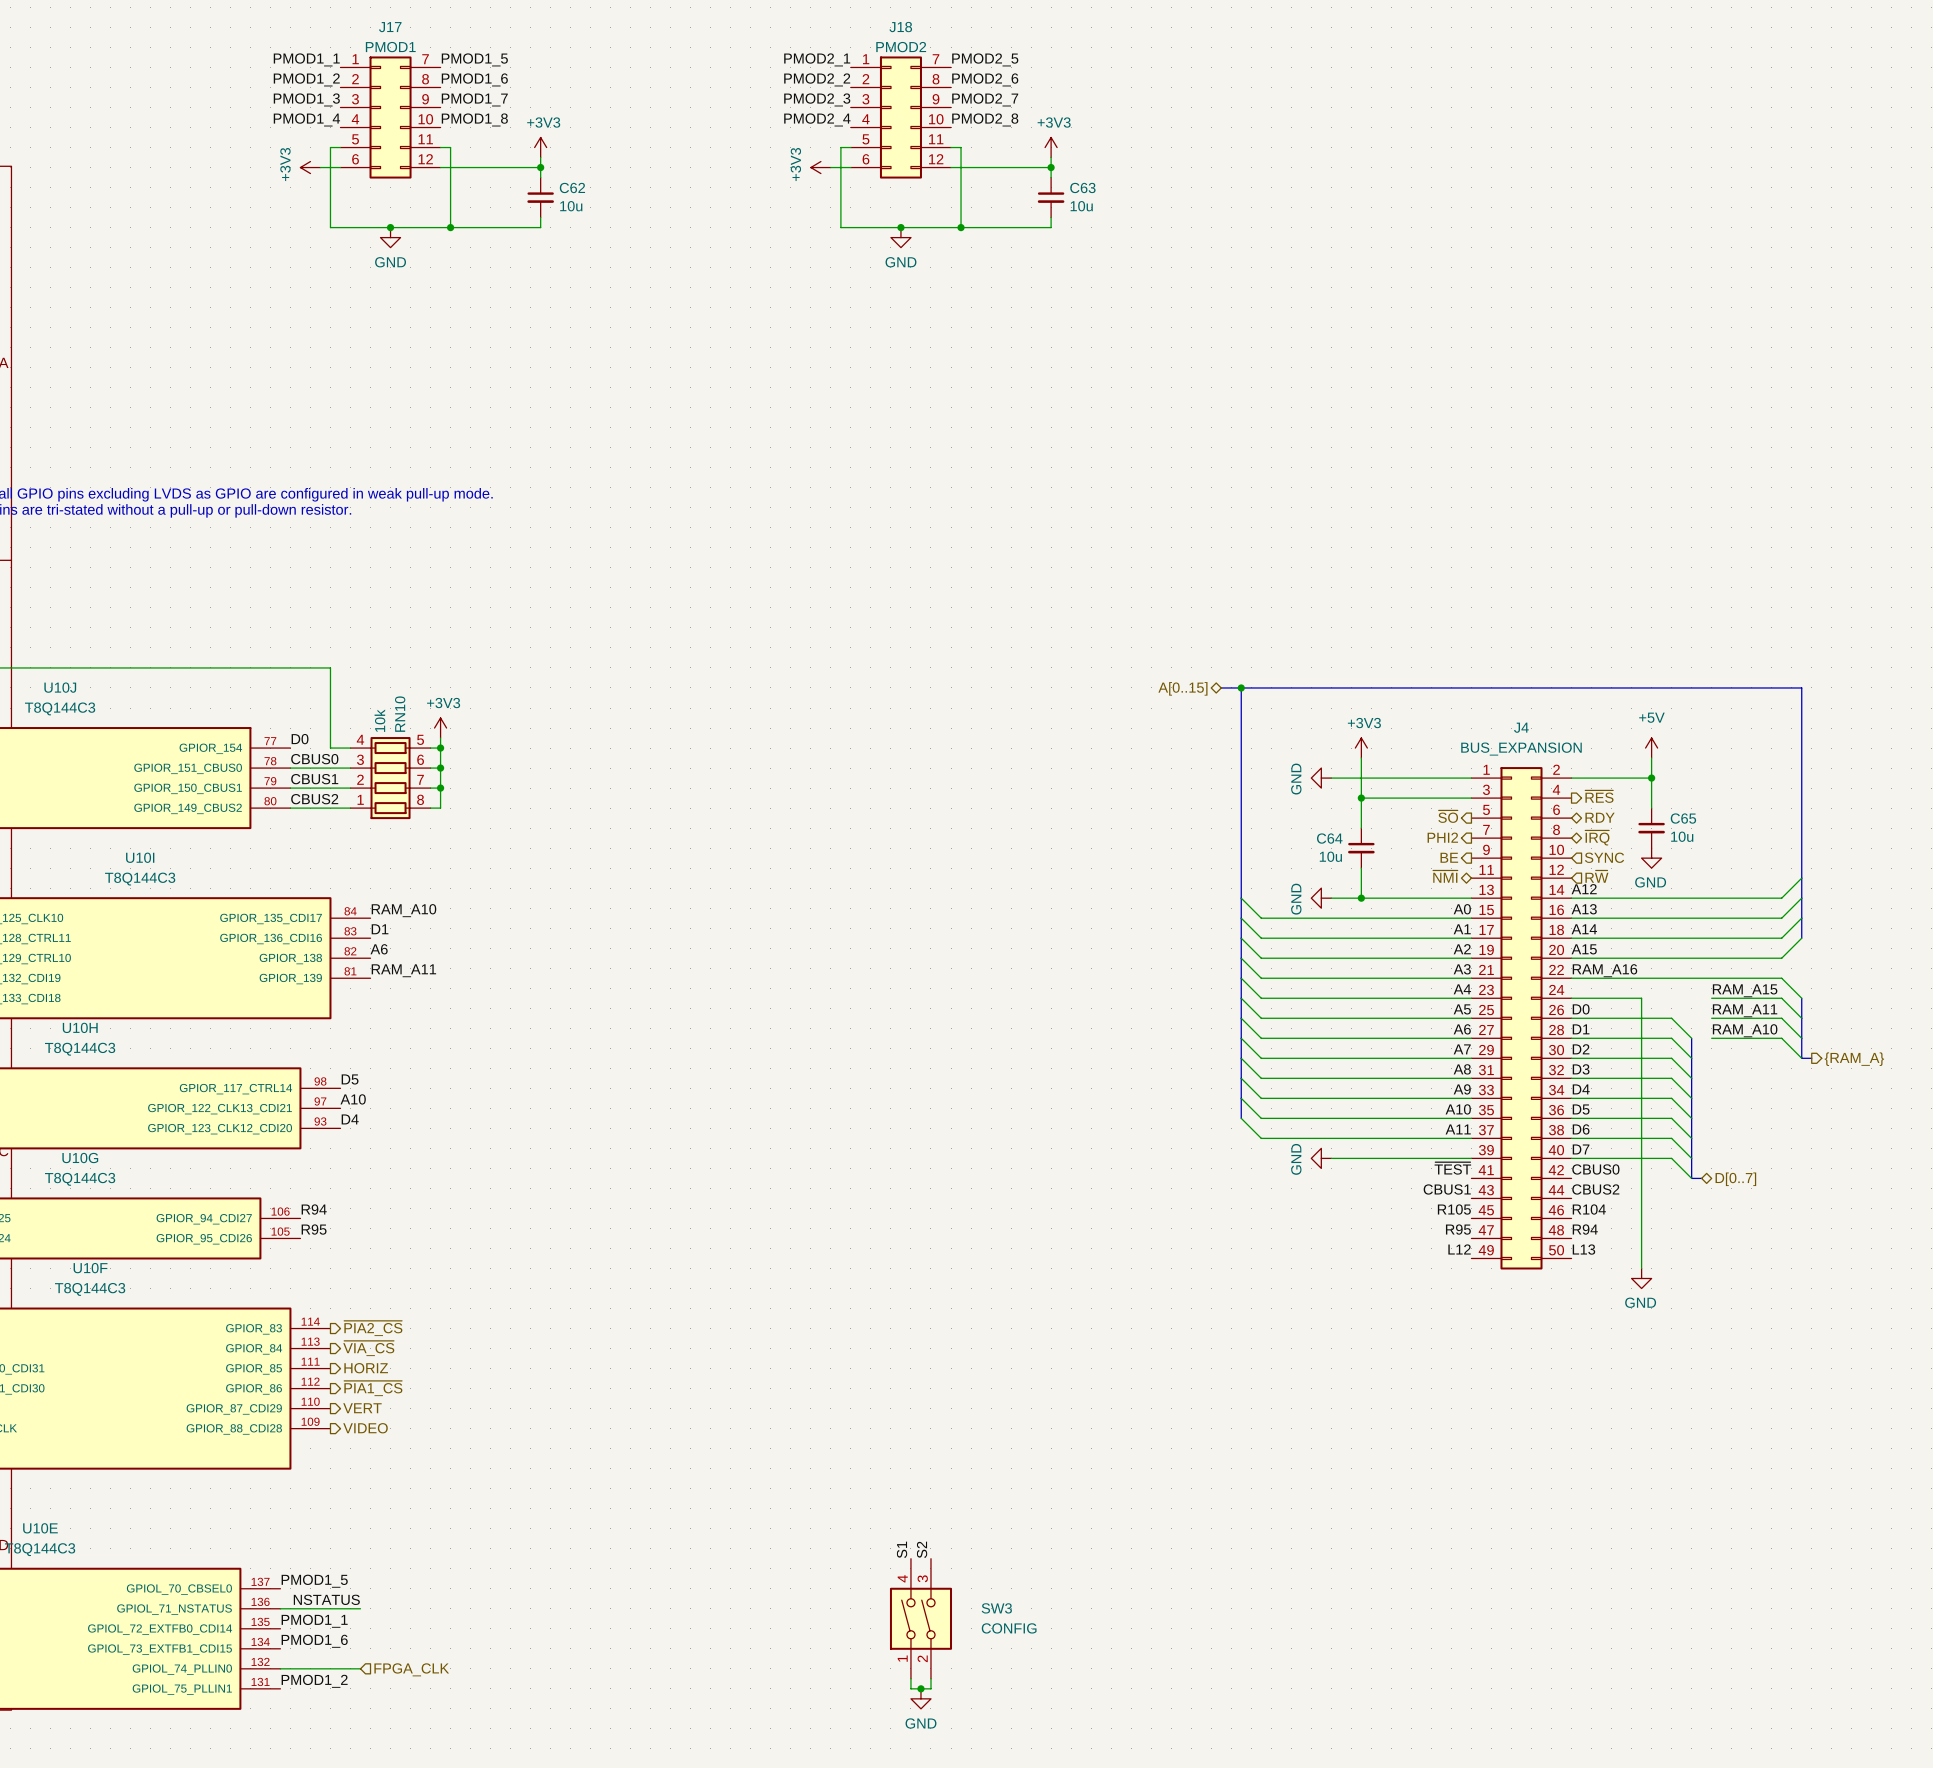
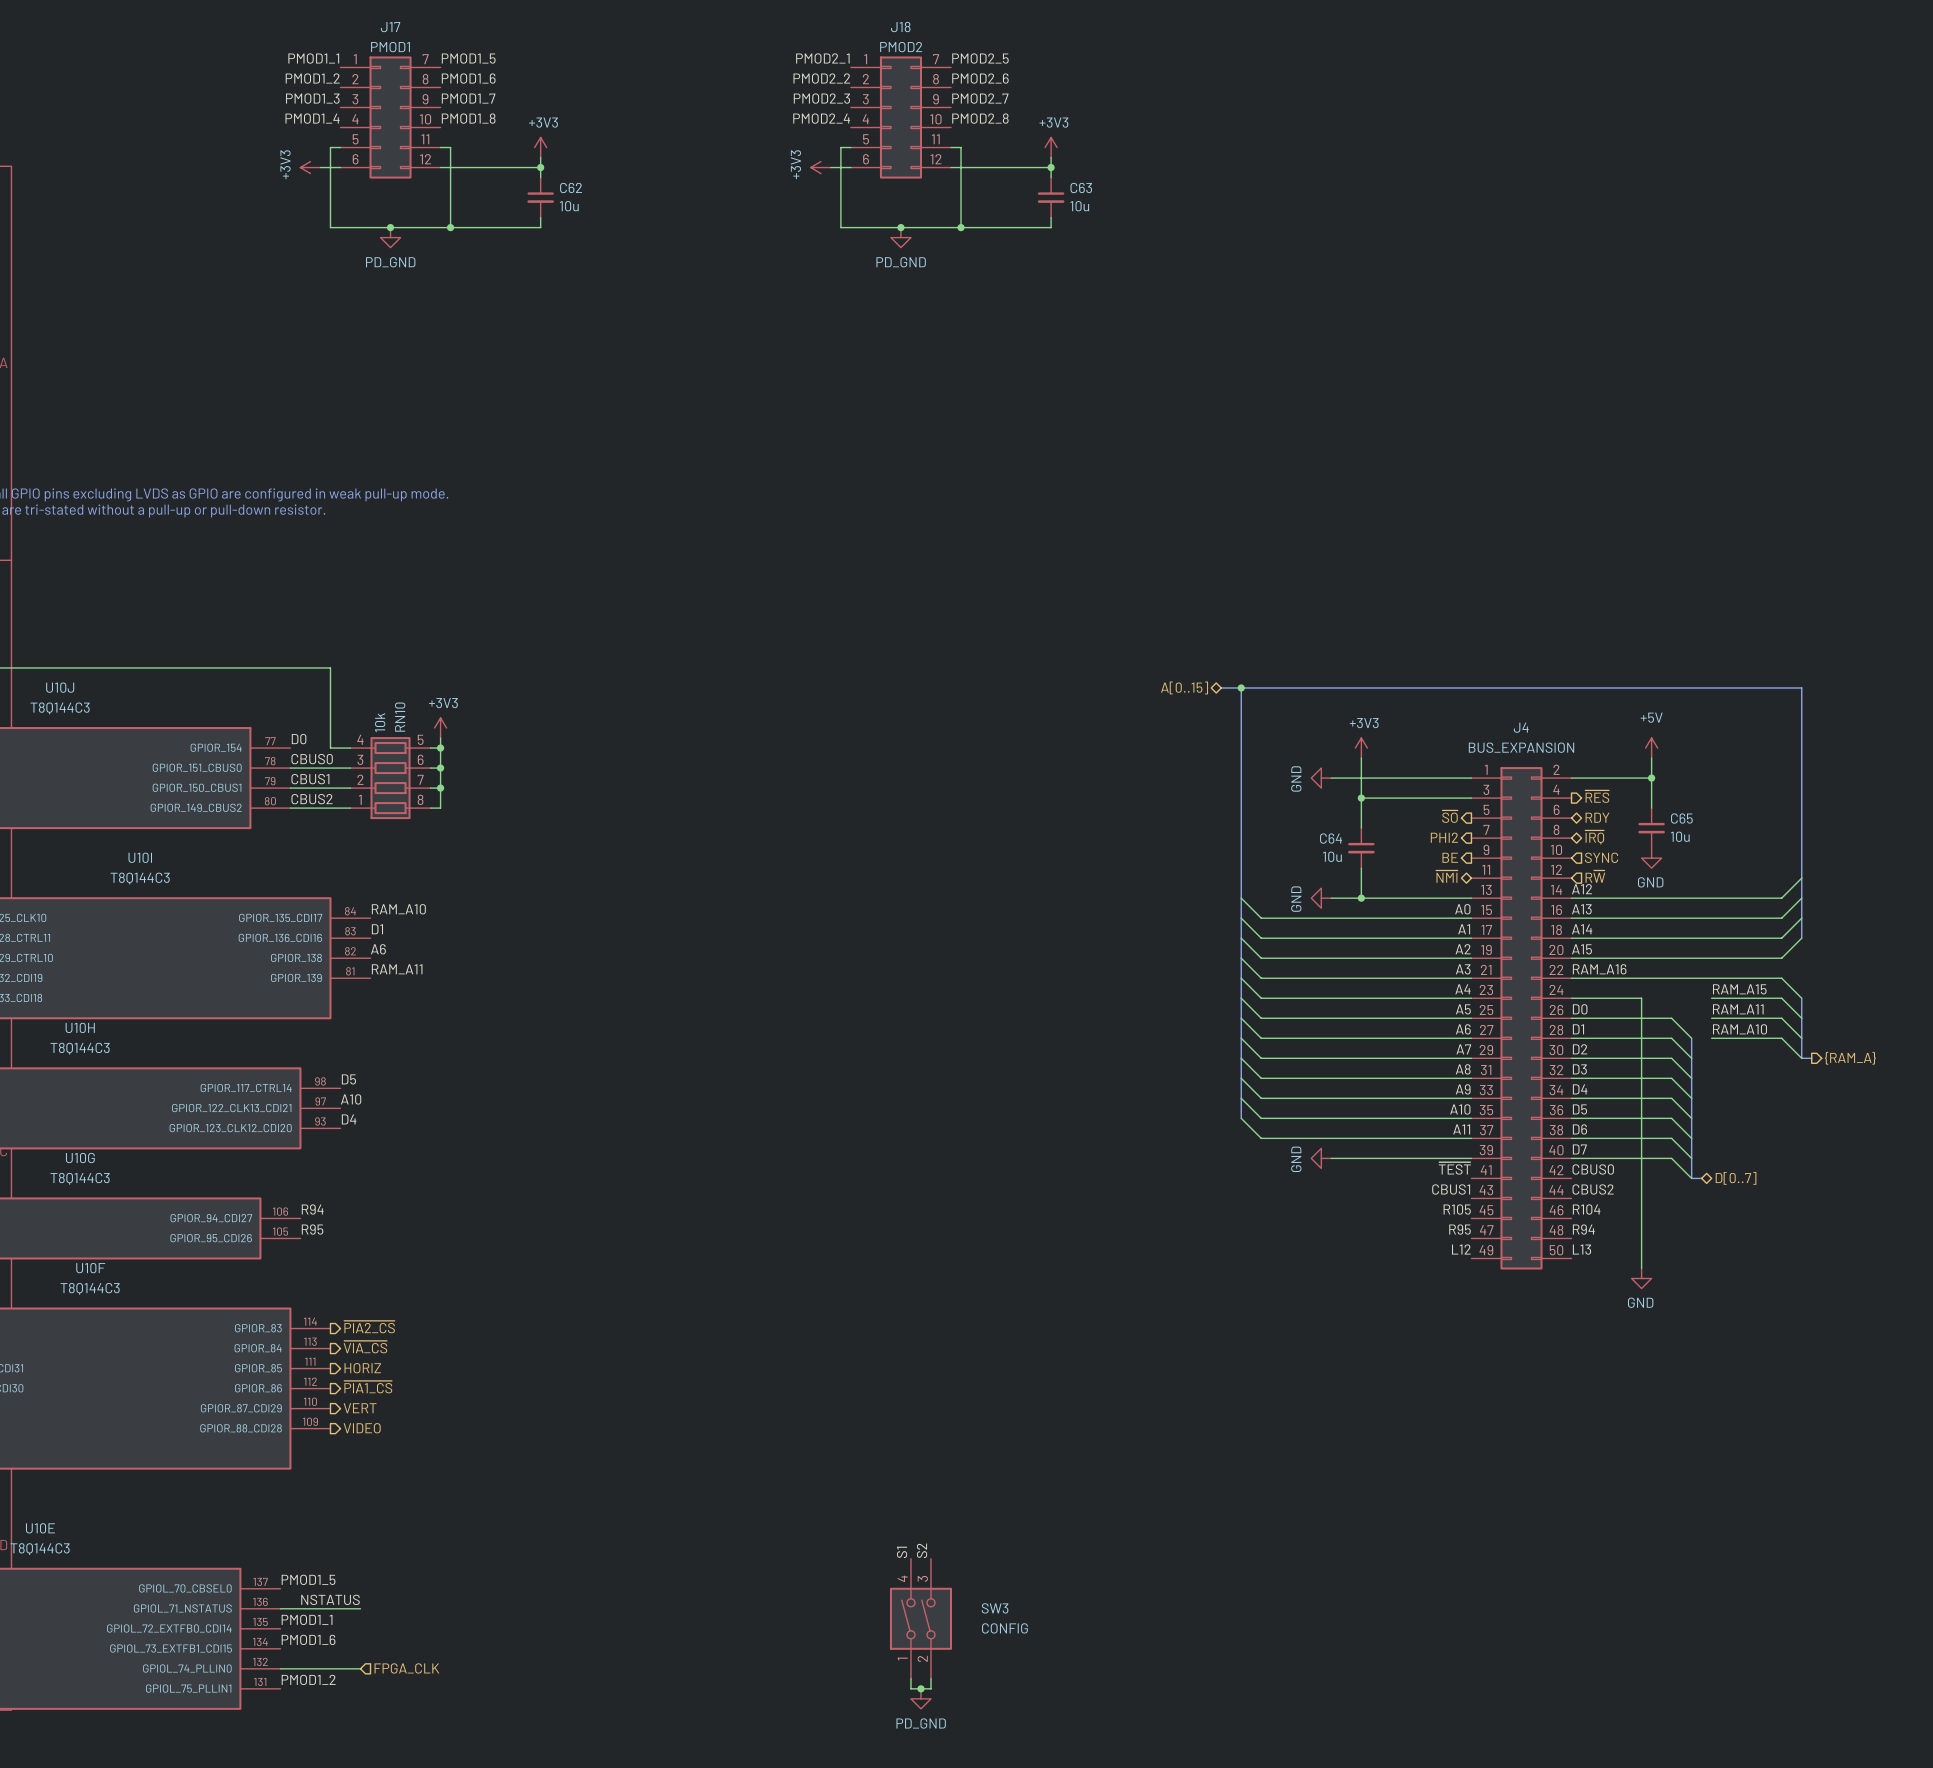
power symbol: GND (390, 237) -> PD_GND (390, 237)
power symbol: GND (900, 237) -> PD_GND (900, 237)
power symbol: GND (920, 1698) -> PD_GND (920, 1698)

